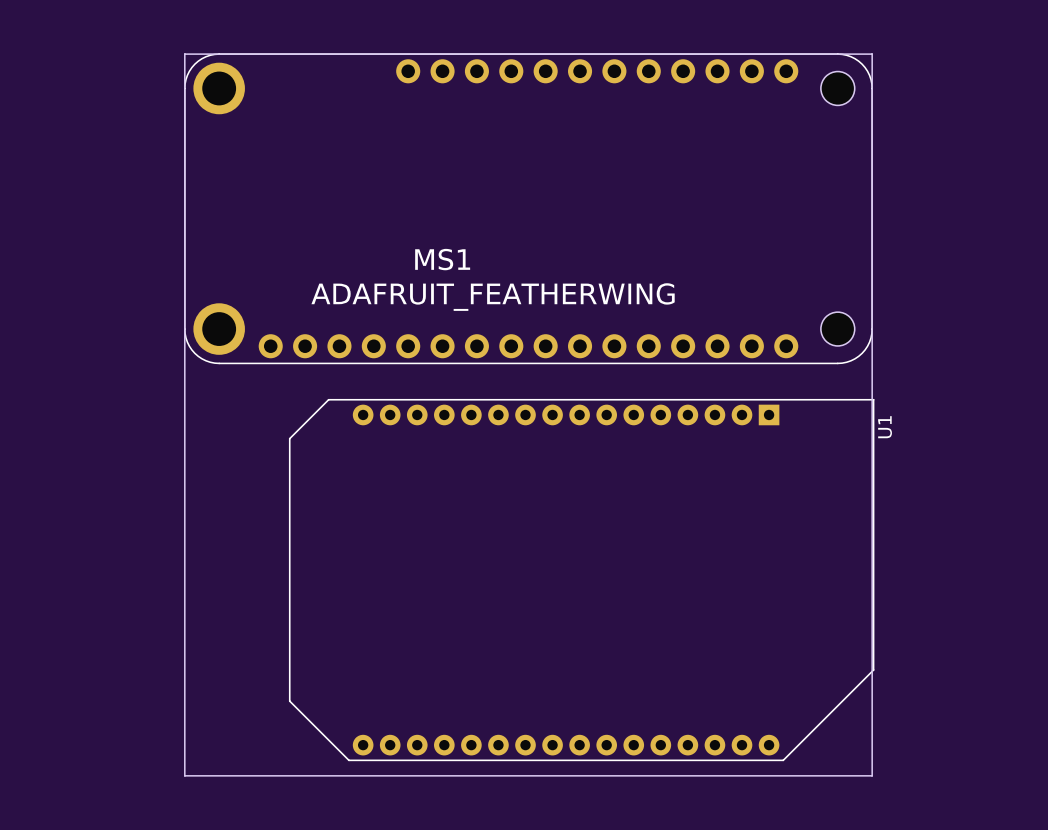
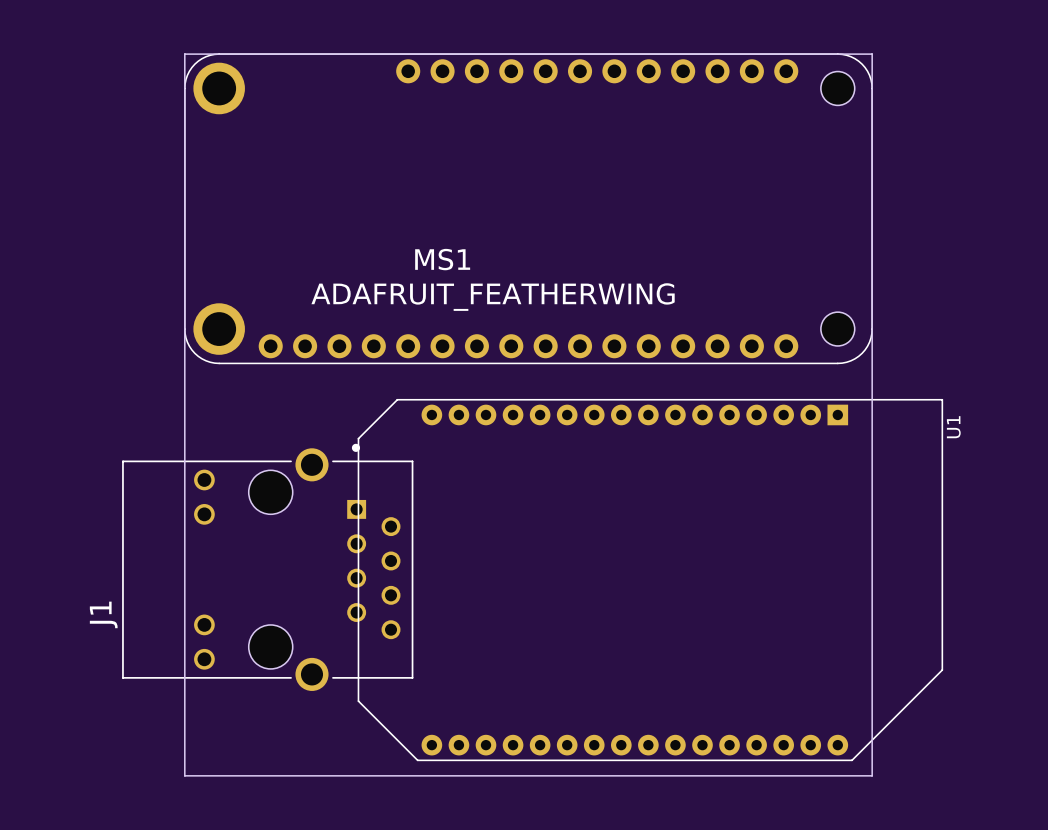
J1: none -> (267, 567)
U1 position: (581, 580) -> (650, 580)

